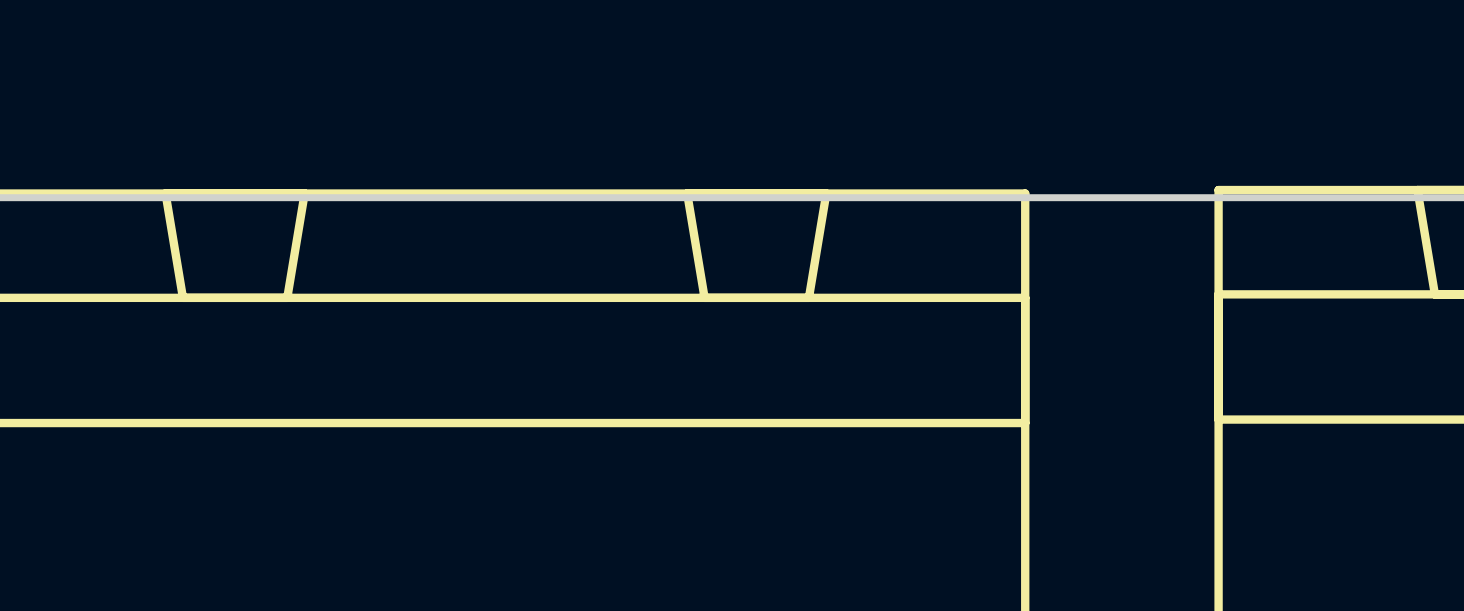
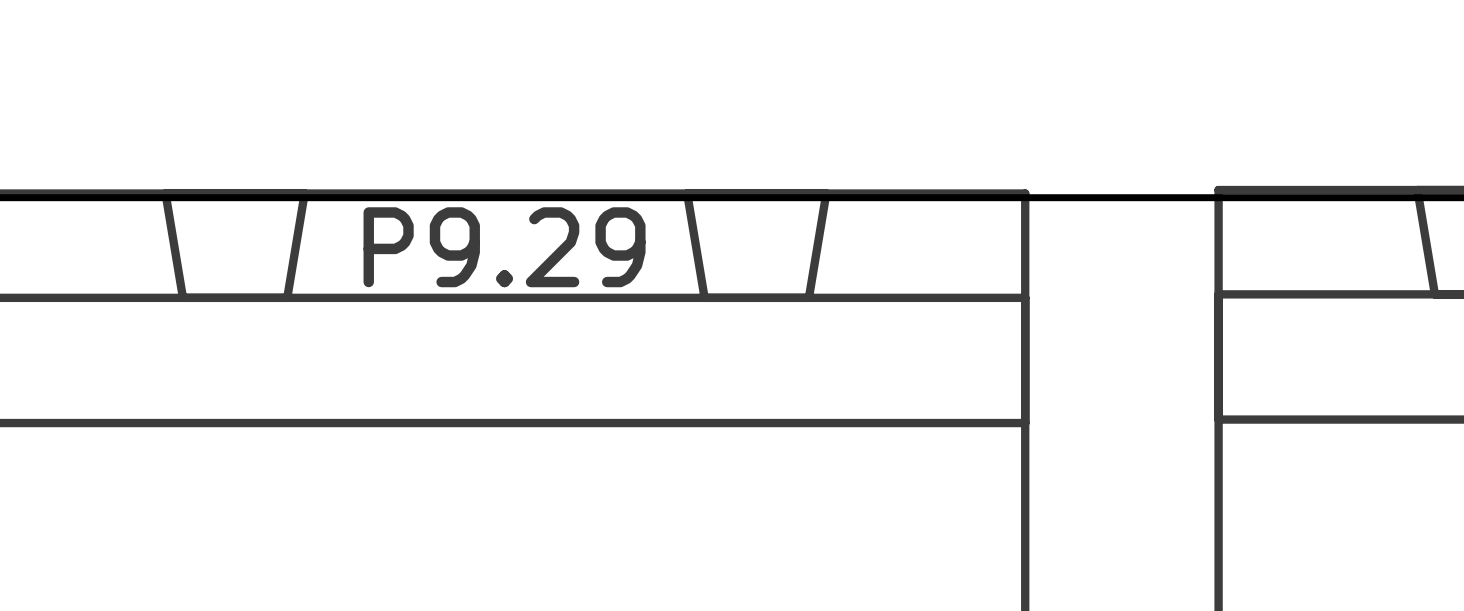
text: none -> P9.29 (504, 247)

